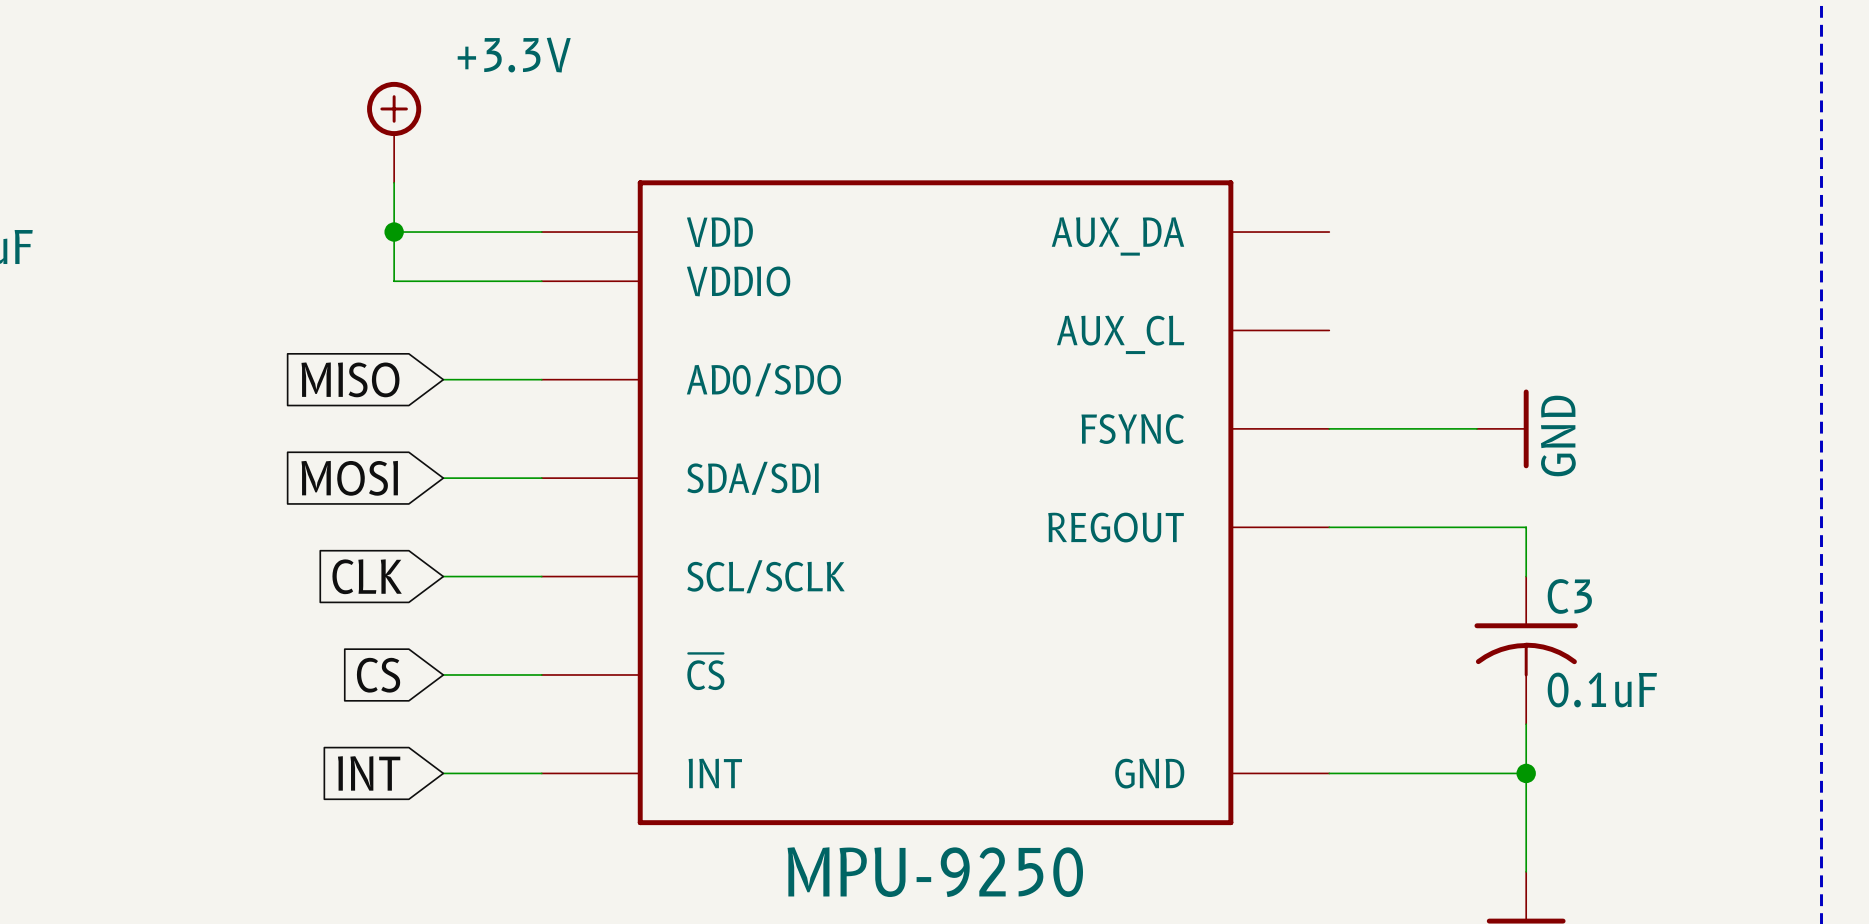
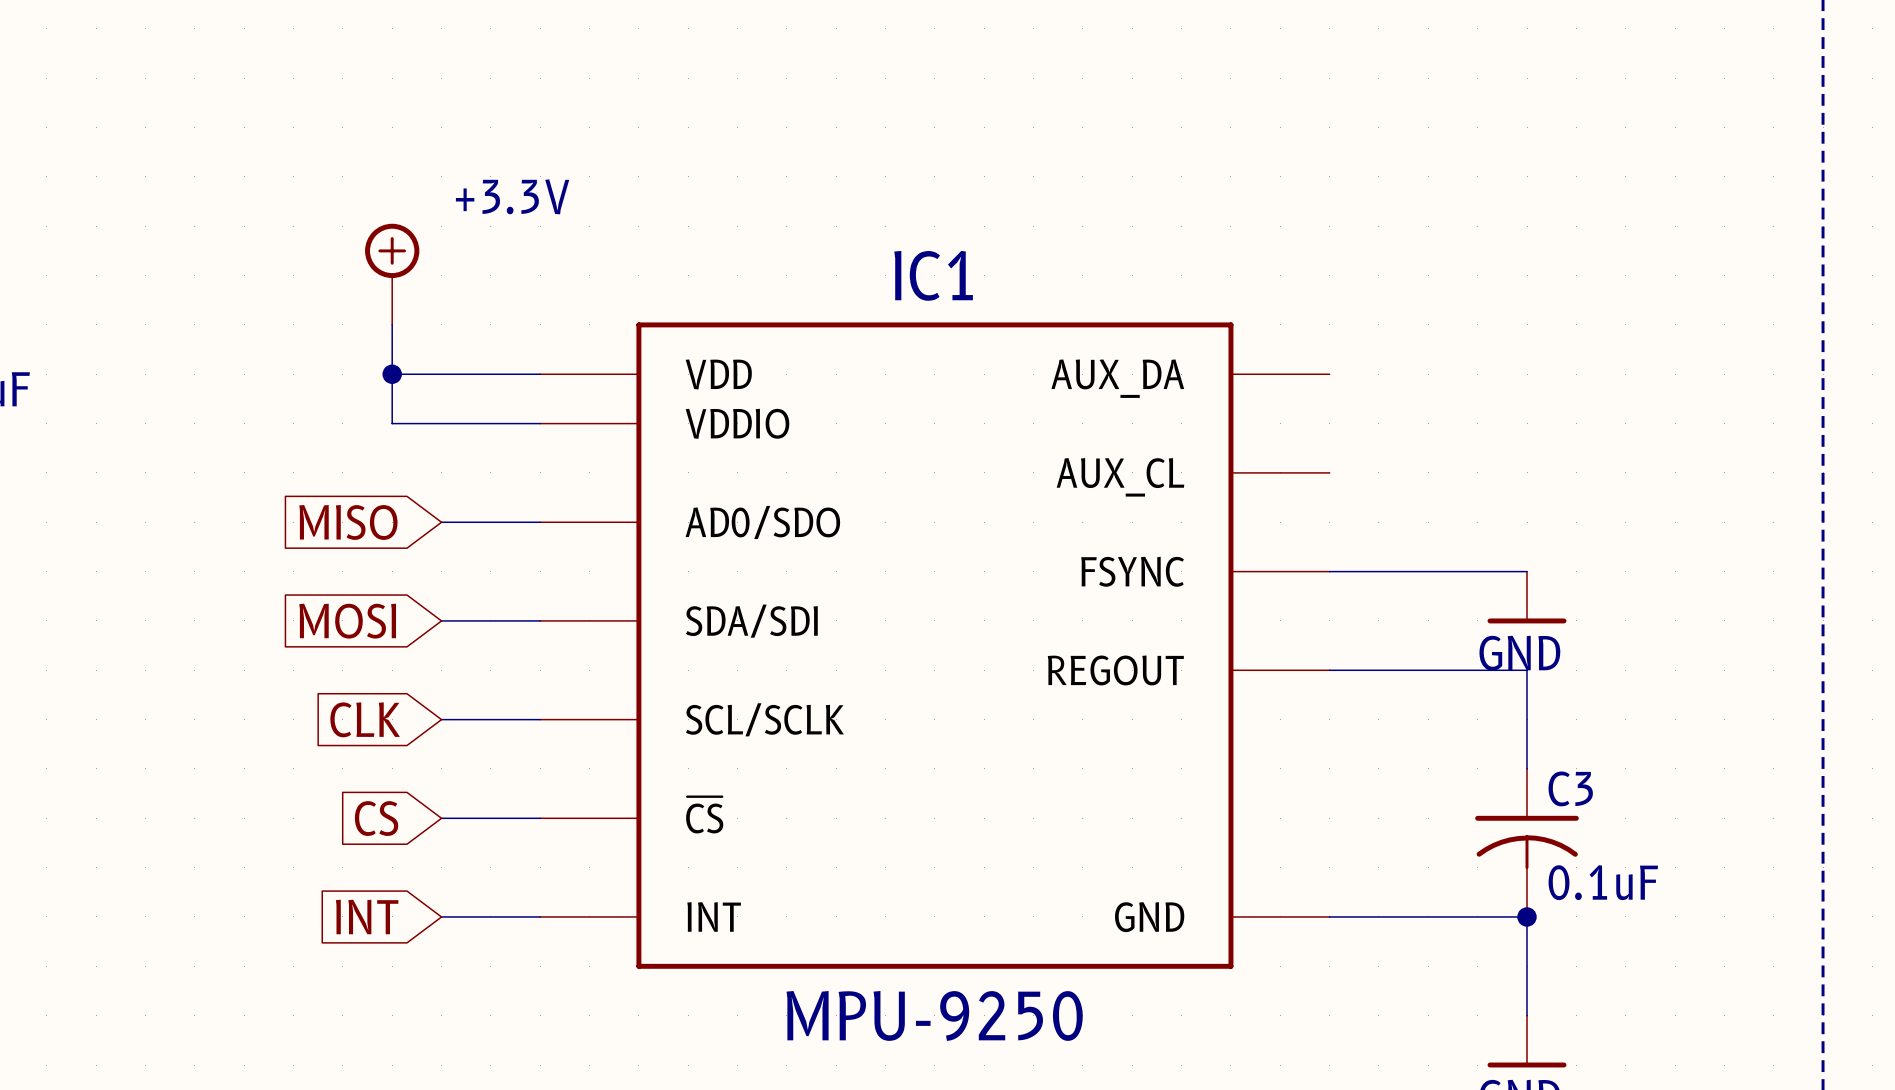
IC1 name: none -> IC1 (933, 275)
power symbol rotation: 0° (1526, 428) -> 90° clockwise (1527, 620)
C3 position: (1526, 650) -> (1527, 842)

